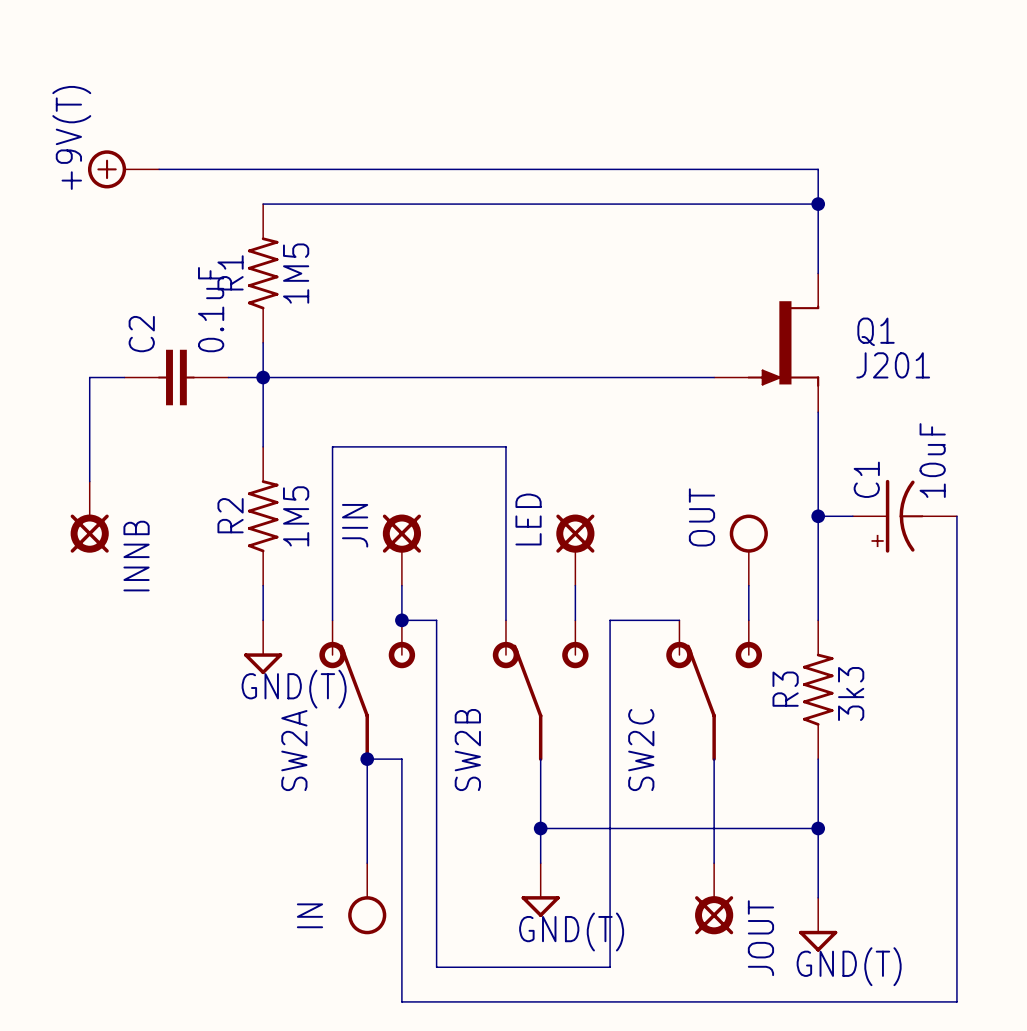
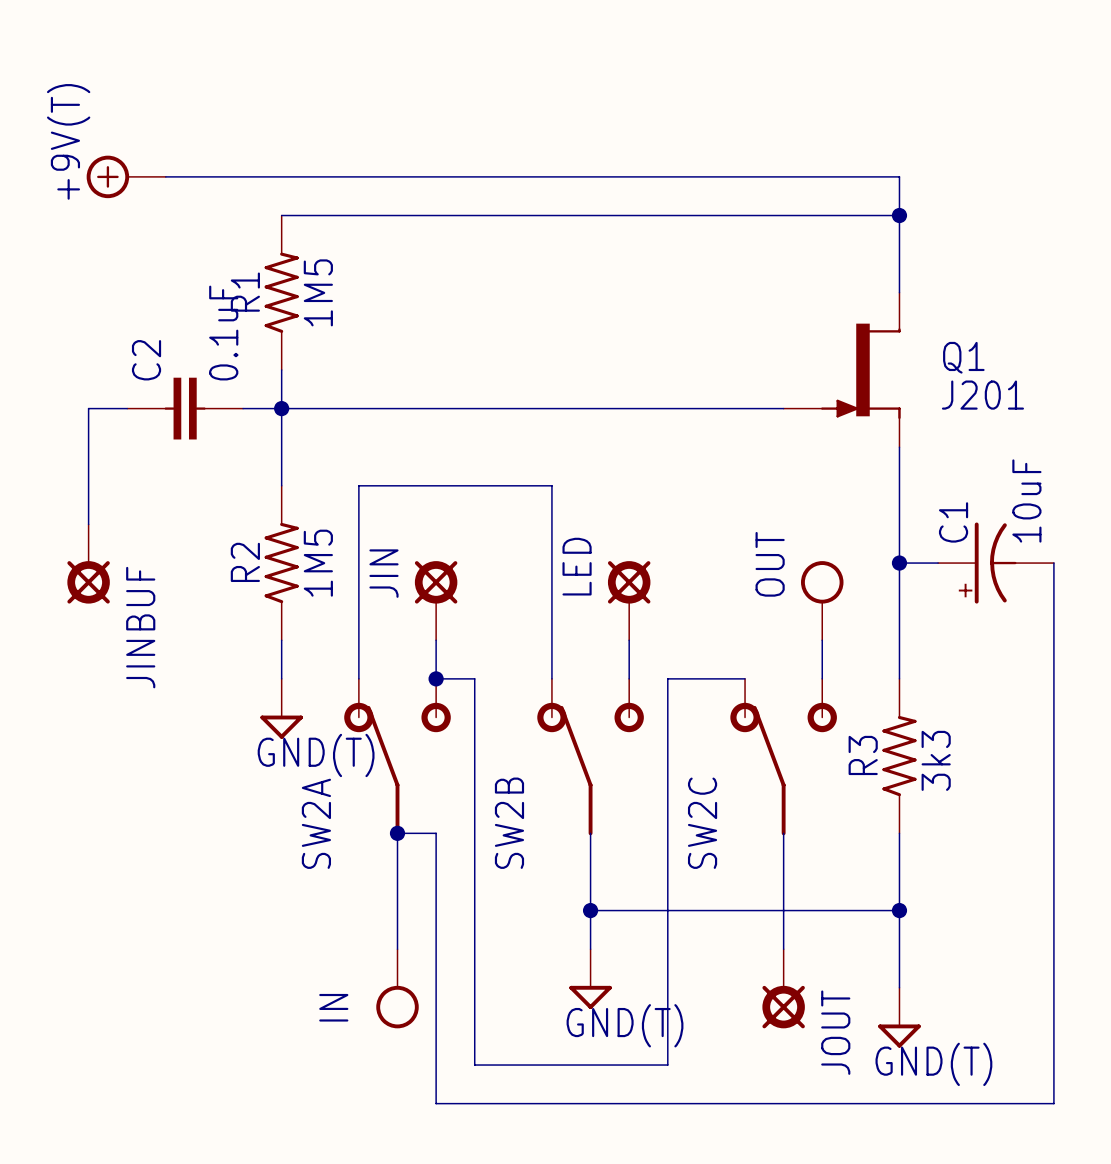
INNB name: INNB (136, 556) -> JINBUF (140, 627)

